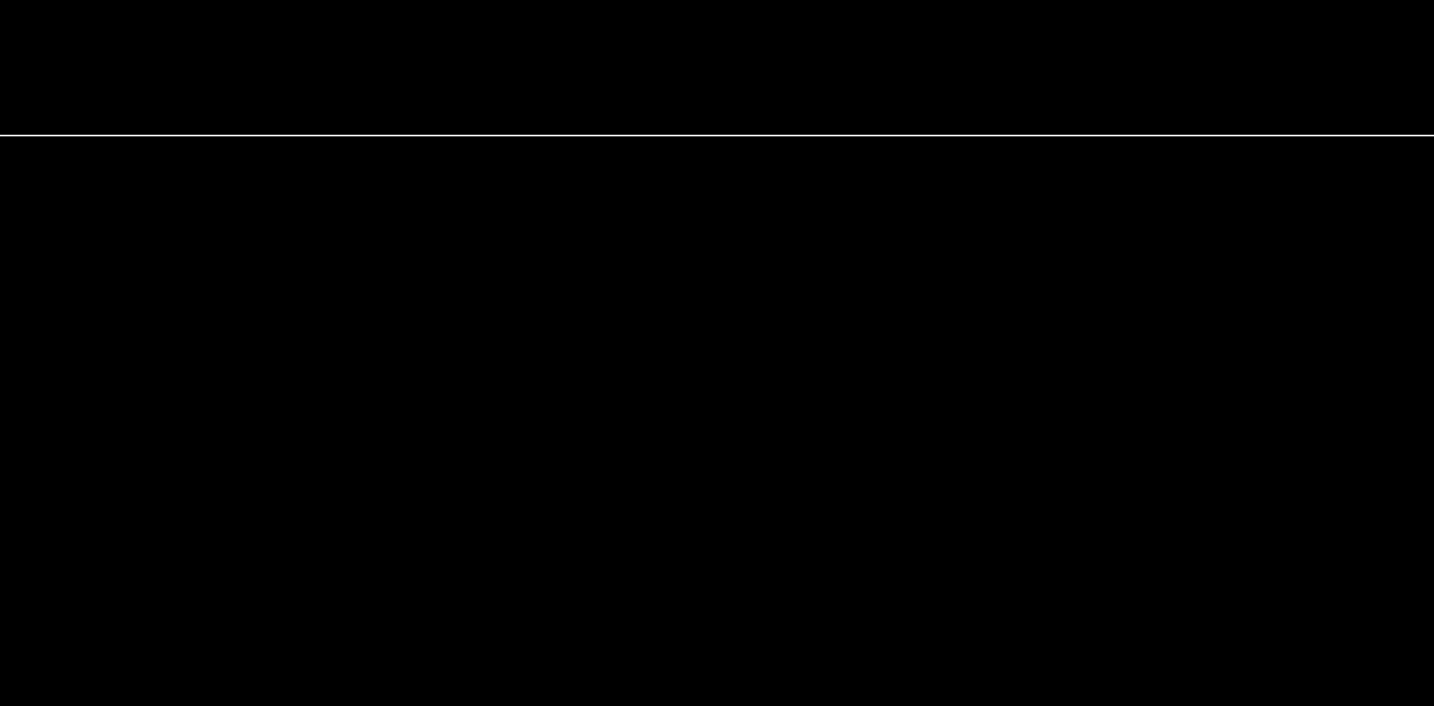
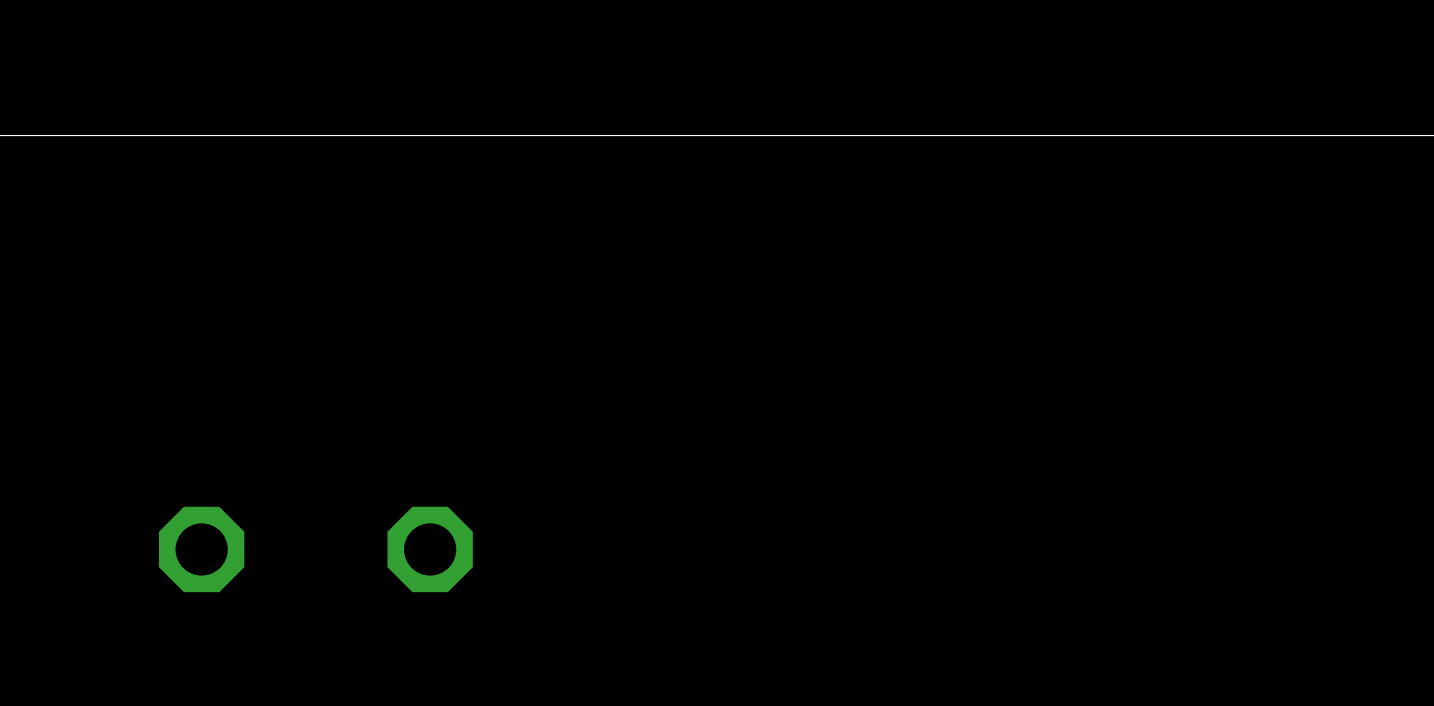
part: none -> (315, 549)

